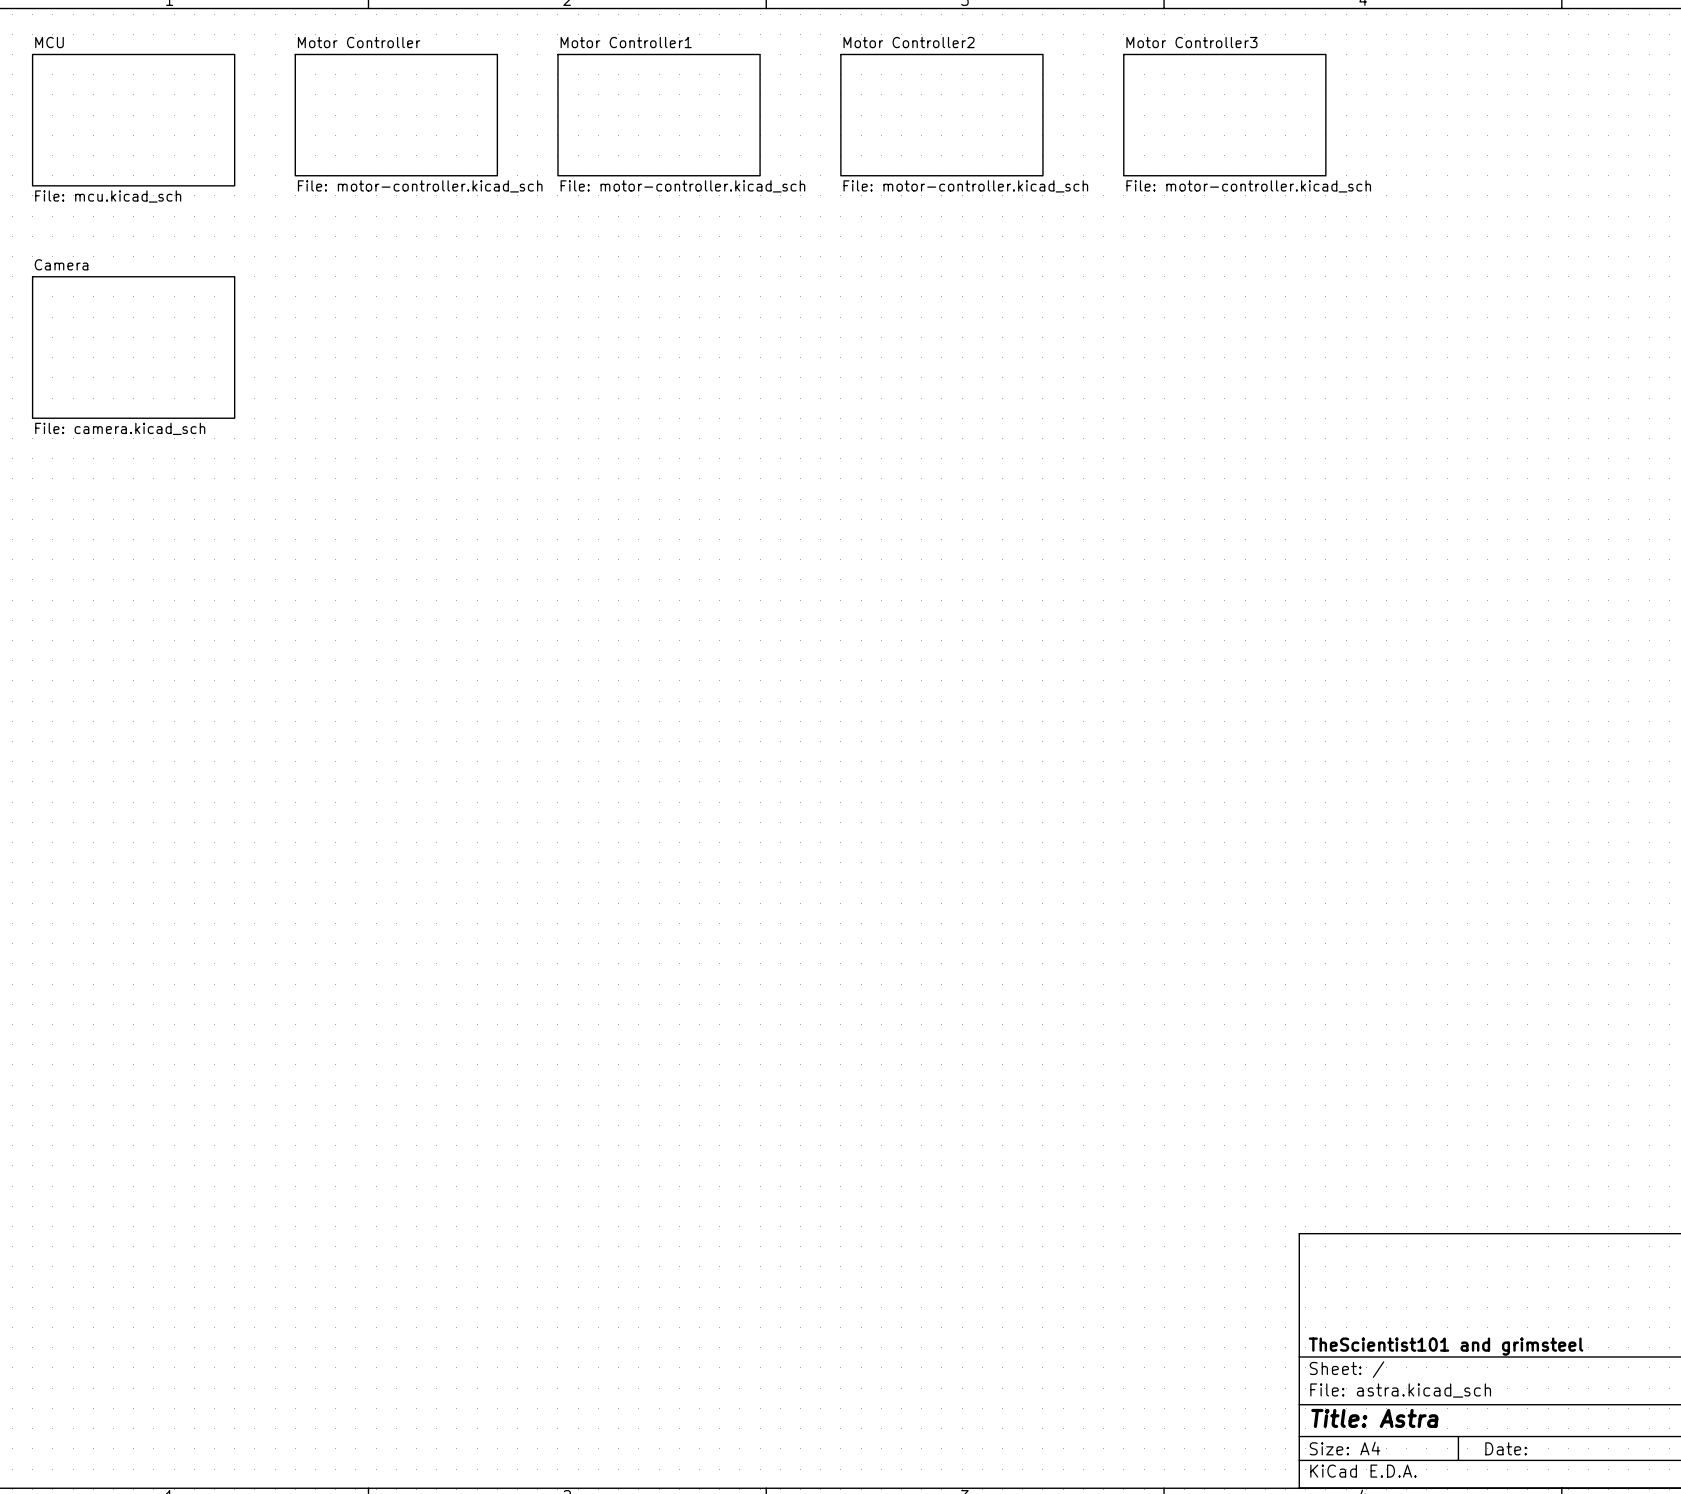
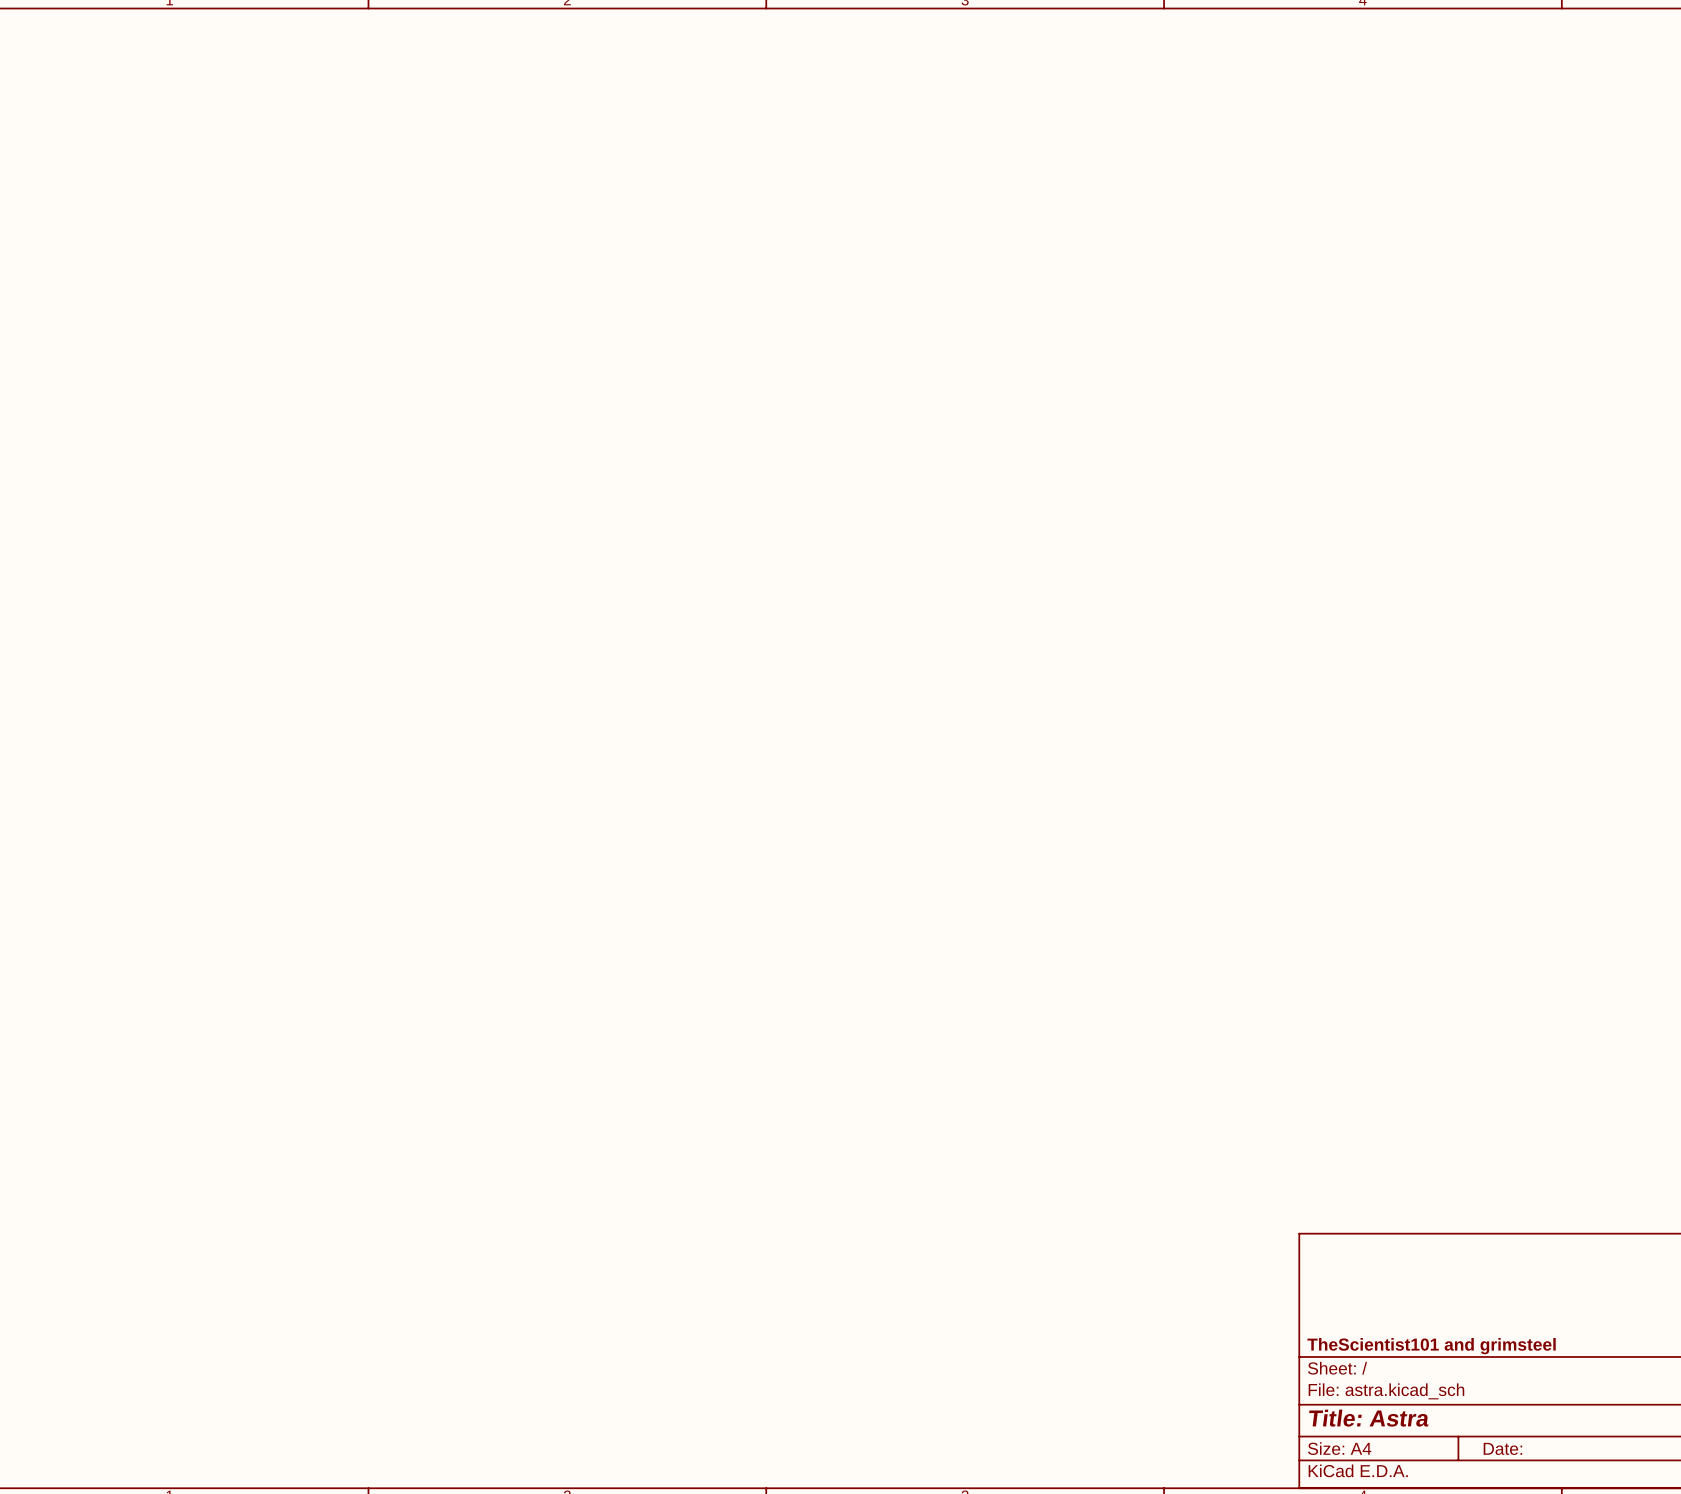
sheet Motor Controller: File: motor-controller.kicad_sch (396, 115) -> none
sheet Motor Controller1: File: motor-controller.kicad_sch (659, 115) -> none
sheet Motor Controller2: File: motor-controller.kicad_sch (941, 115) -> none
sheet Motor Controller3: File: motor-controller.kicad_sch (1224, 115) -> none
sheet MCU: File: mcu.kicad_sch (133, 120) -> none
sheet Camera: File: camera.kicad_sch (133, 347) -> none

